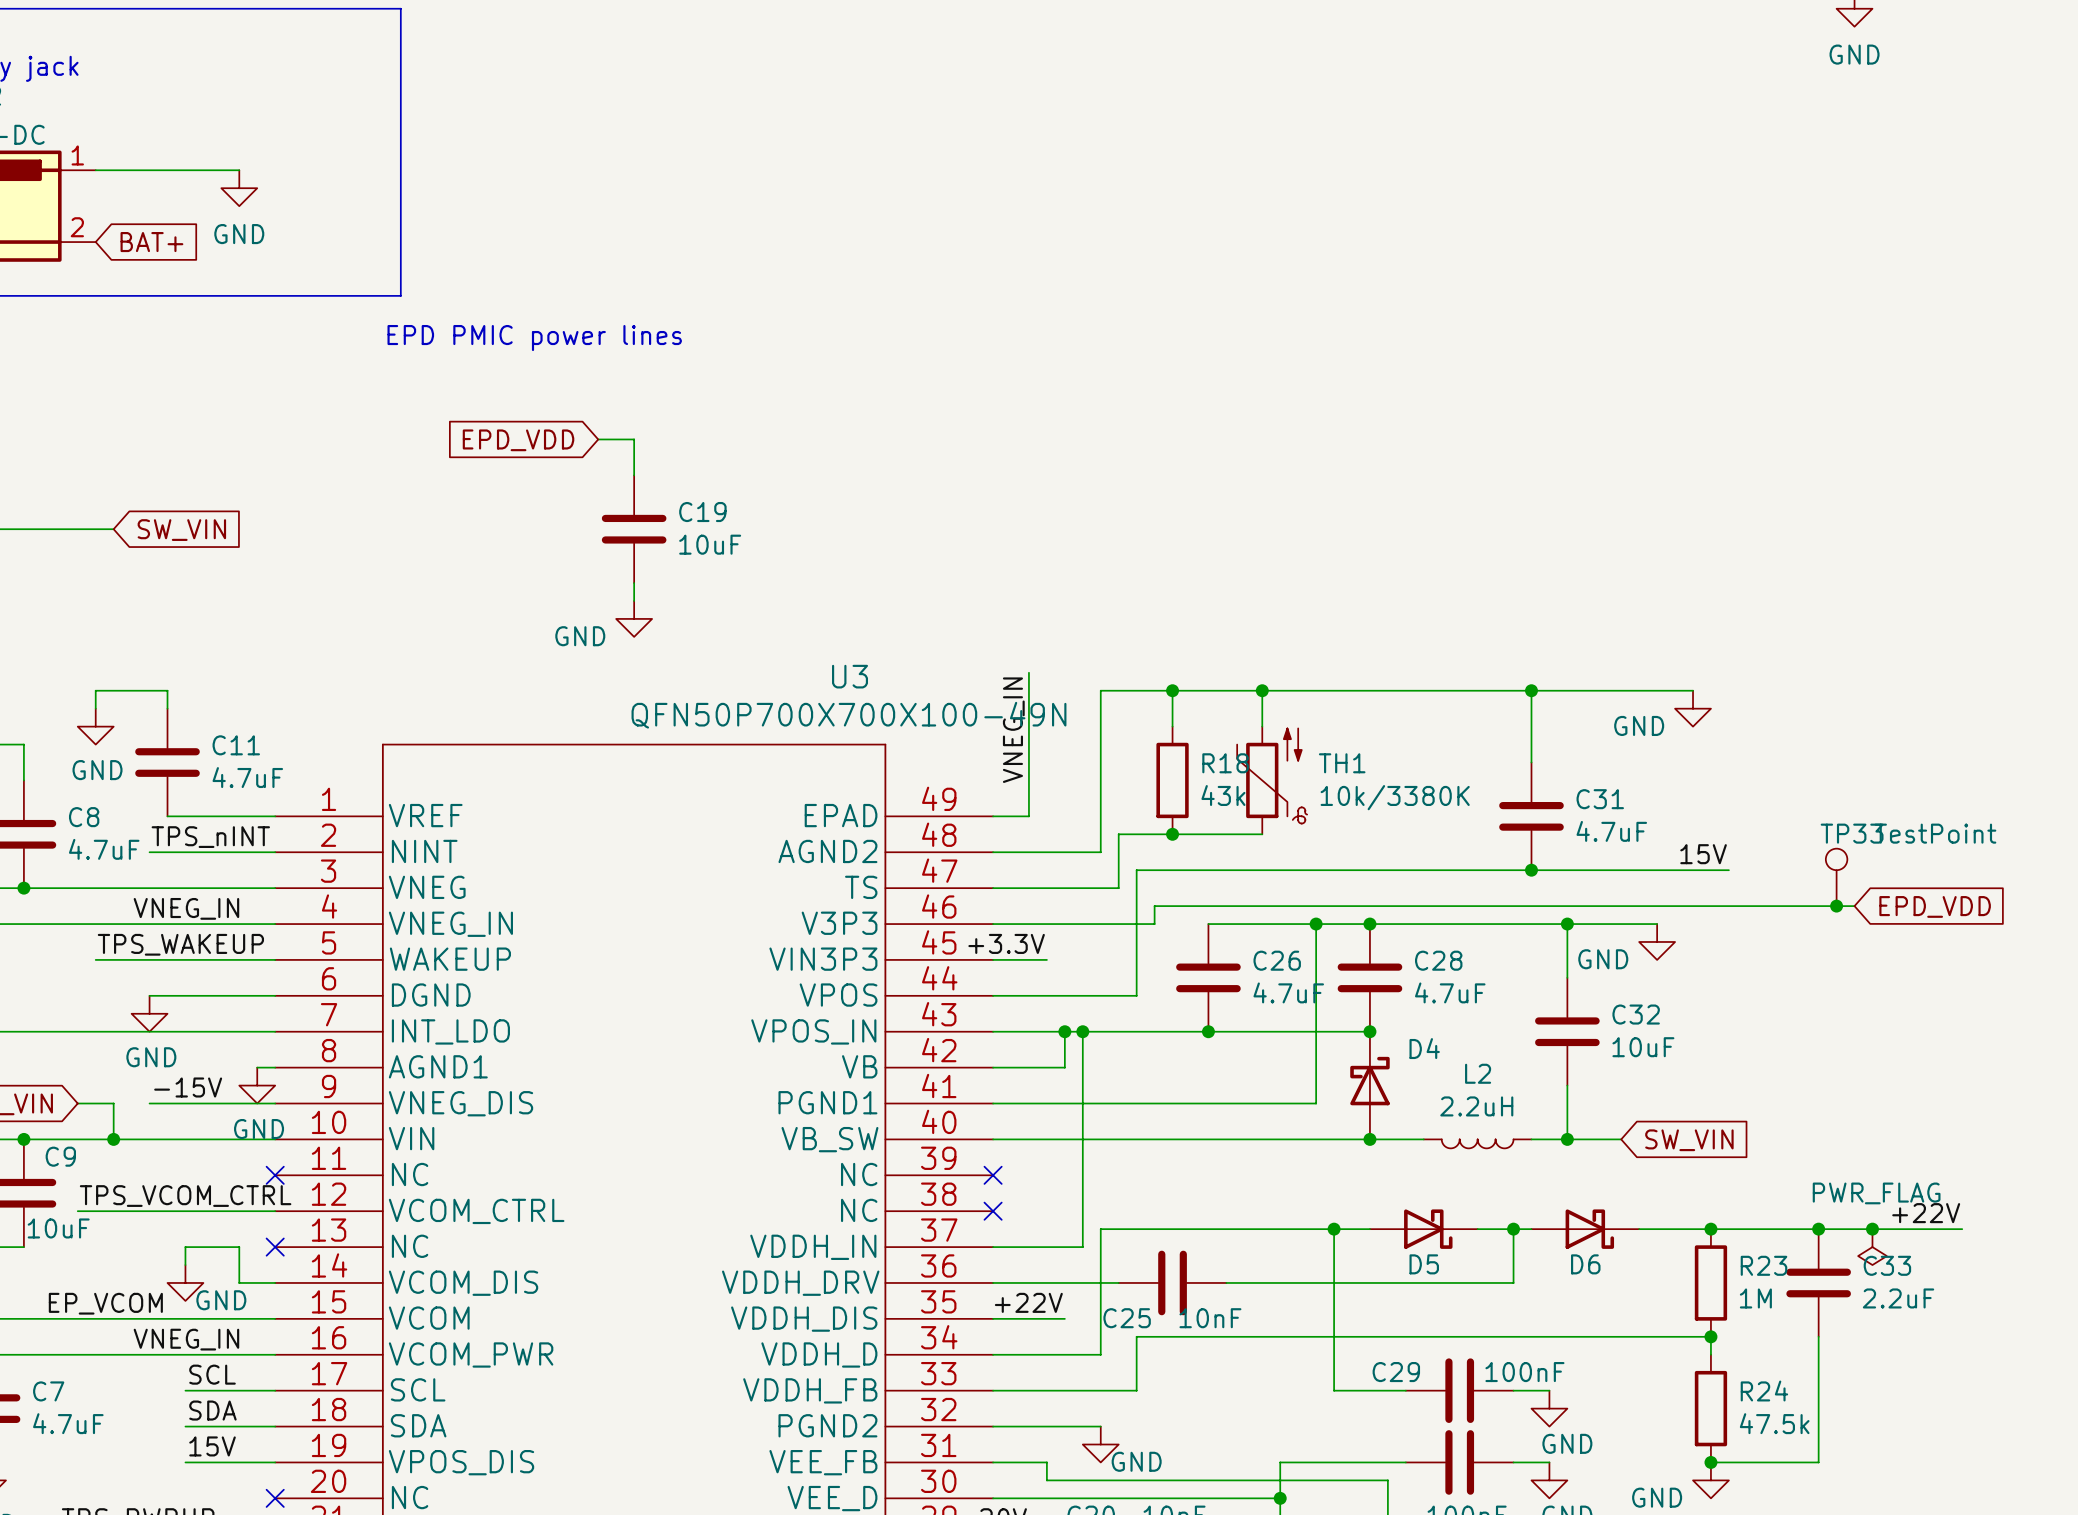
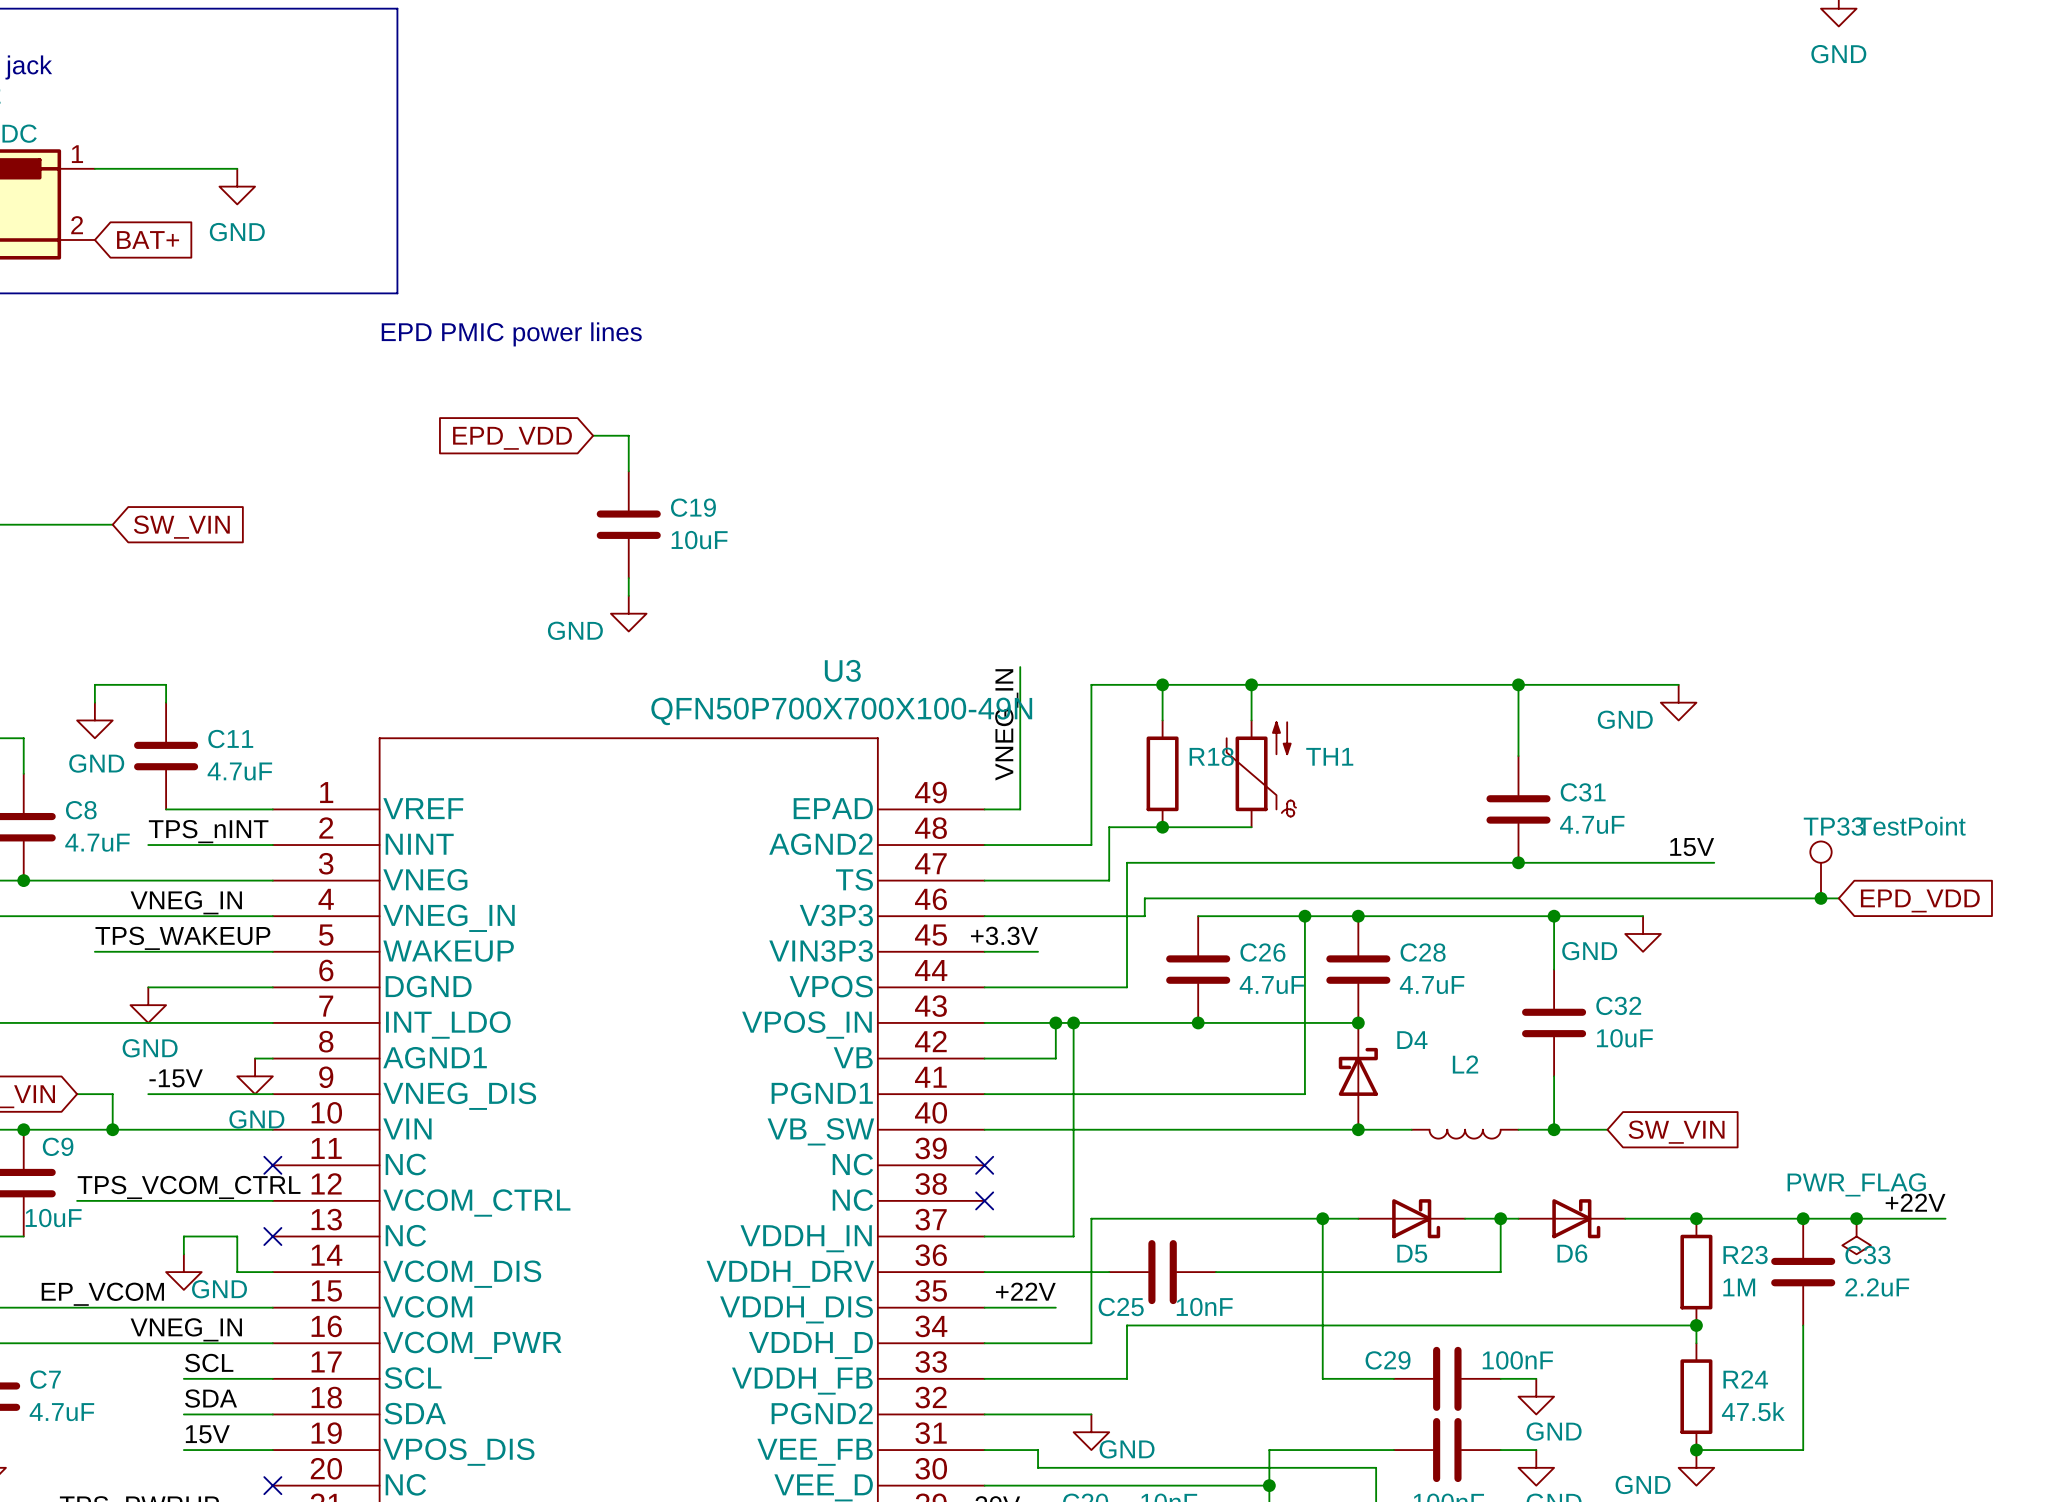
R18 value: 43k (1223, 795) -> none
TH1 value: 10k/3380K (1395, 797) -> none
L2 value: 2.2uH (1476, 1106) -> none

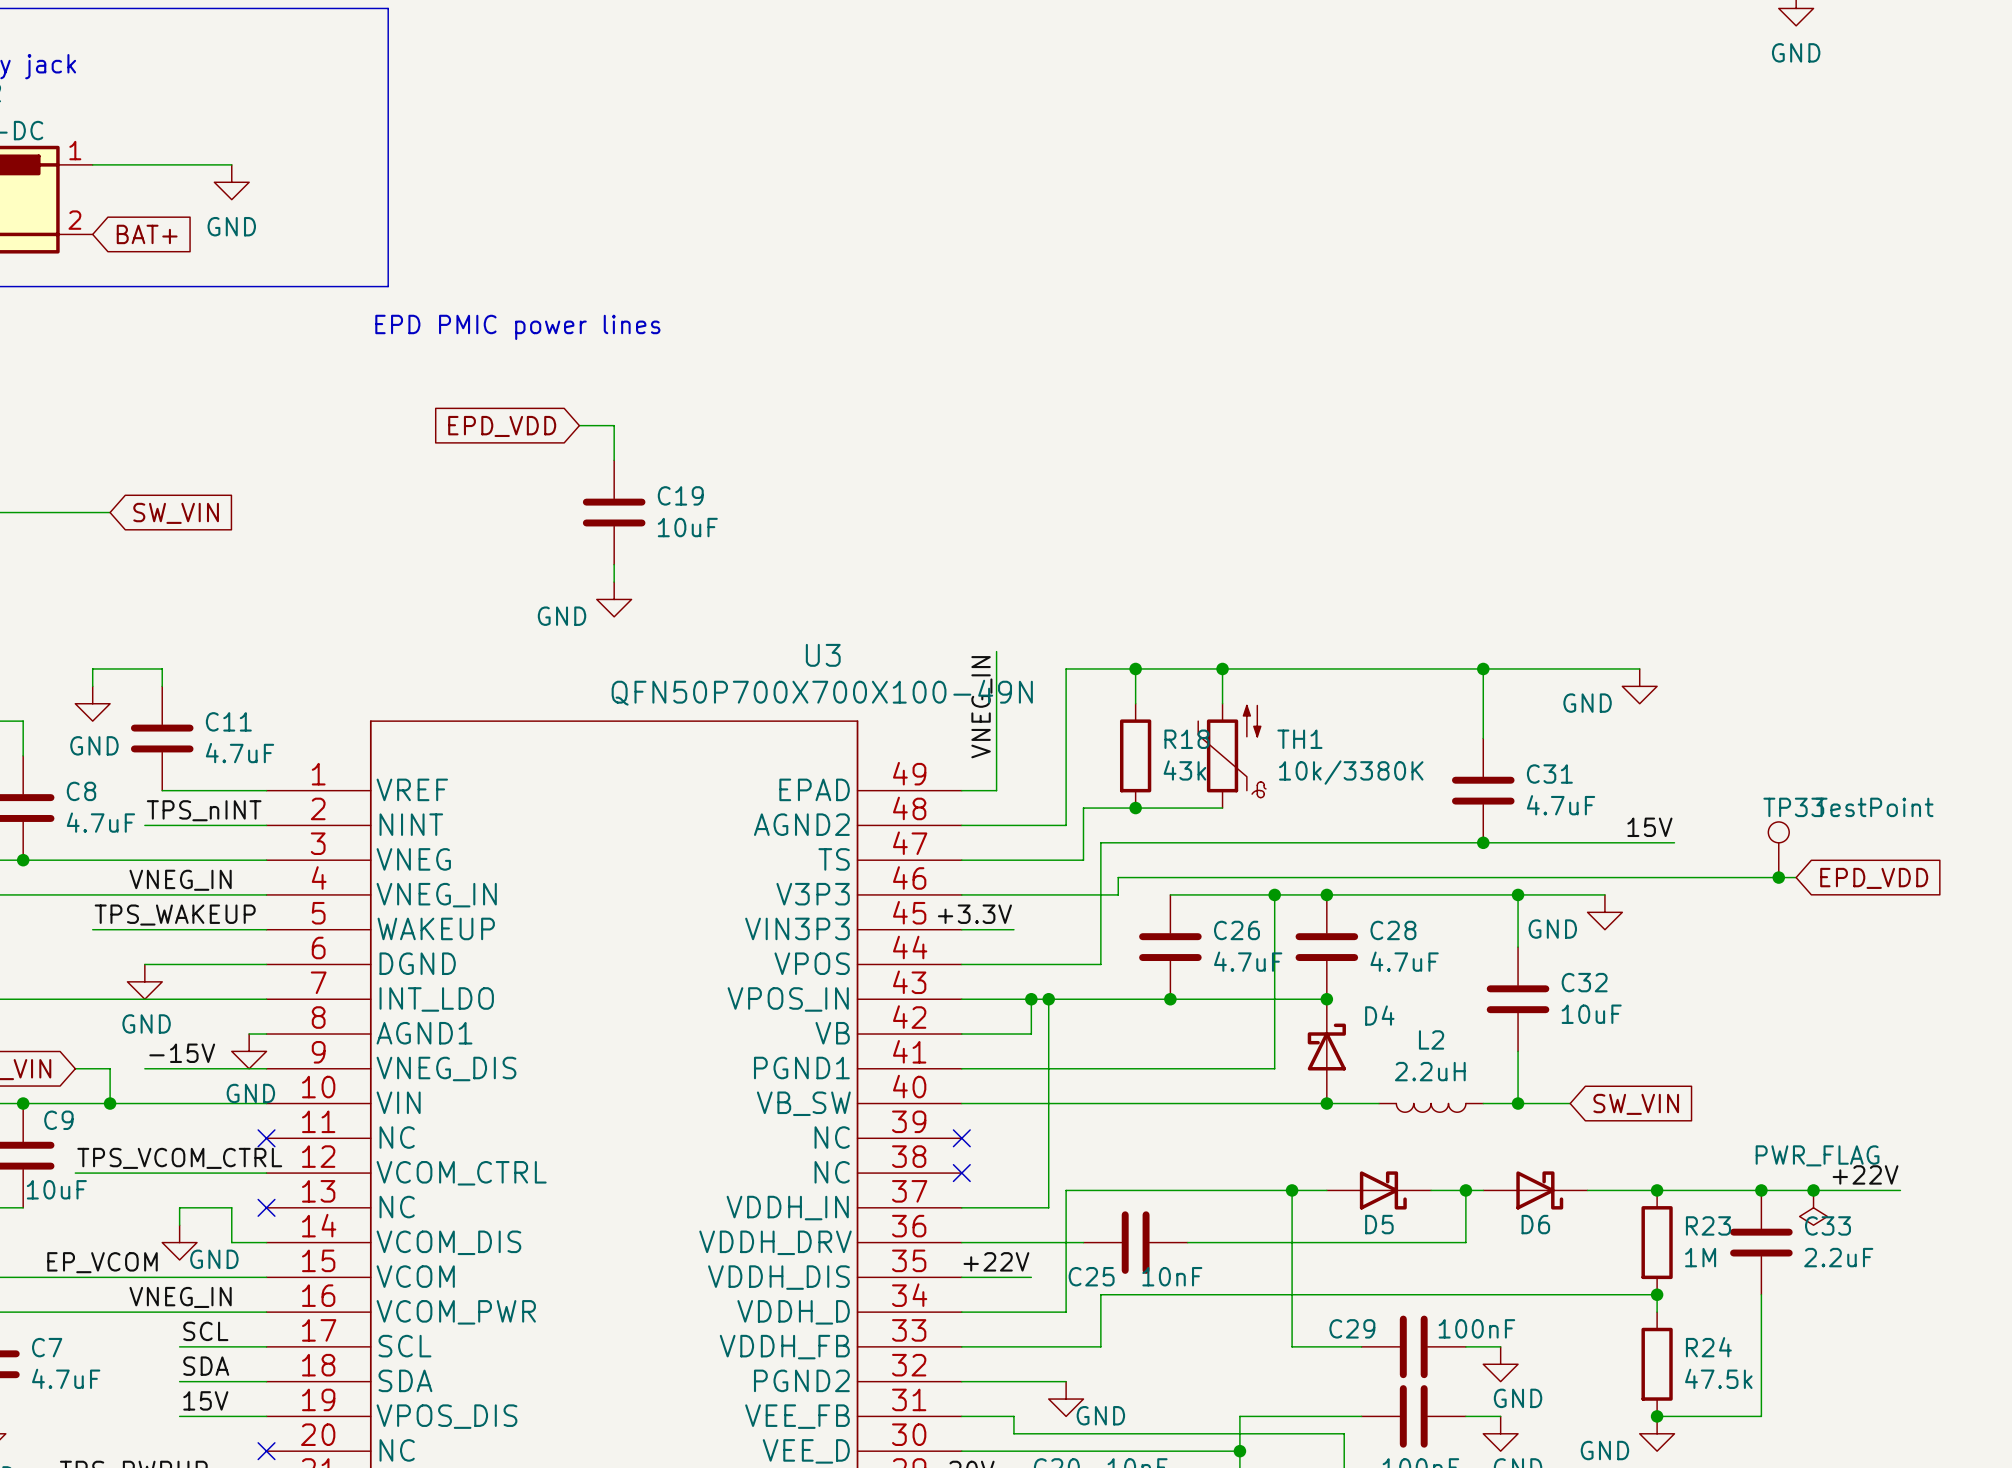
R18 value: none -> 43k (1184, 770)
TH1 value: none -> 10k/3380K (1351, 772)
L2 value: none -> 2.2uH (1430, 1071)

